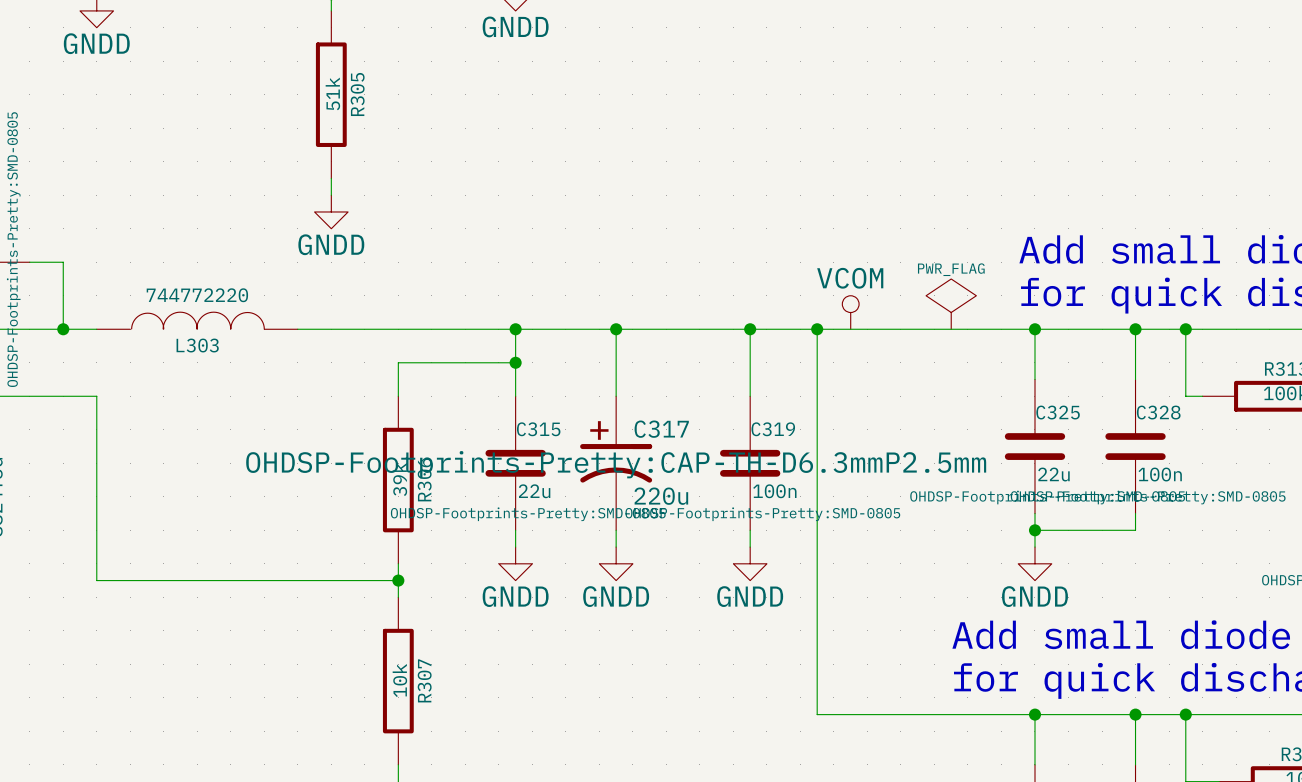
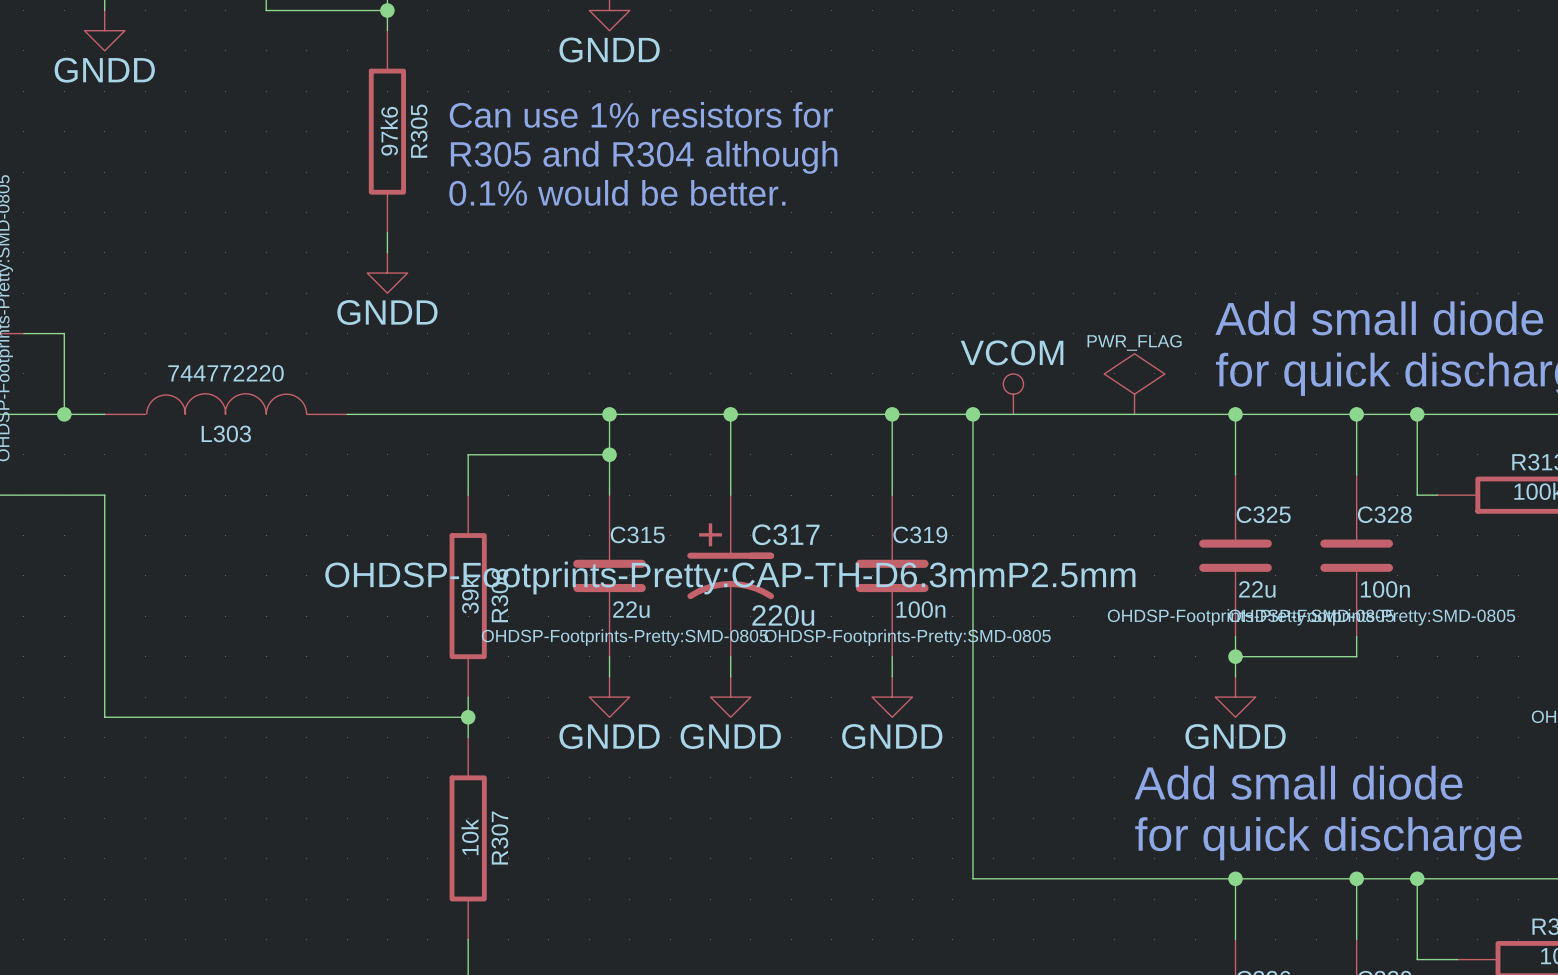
text: none -> Can use 1% resistors for (641, 114)
R305 value: 51k (332, 93) -> 97k6 (389, 131)
text: none -> R305 and R304 although (644, 157)
text: none -> 0.1% would be better. (617, 192)

